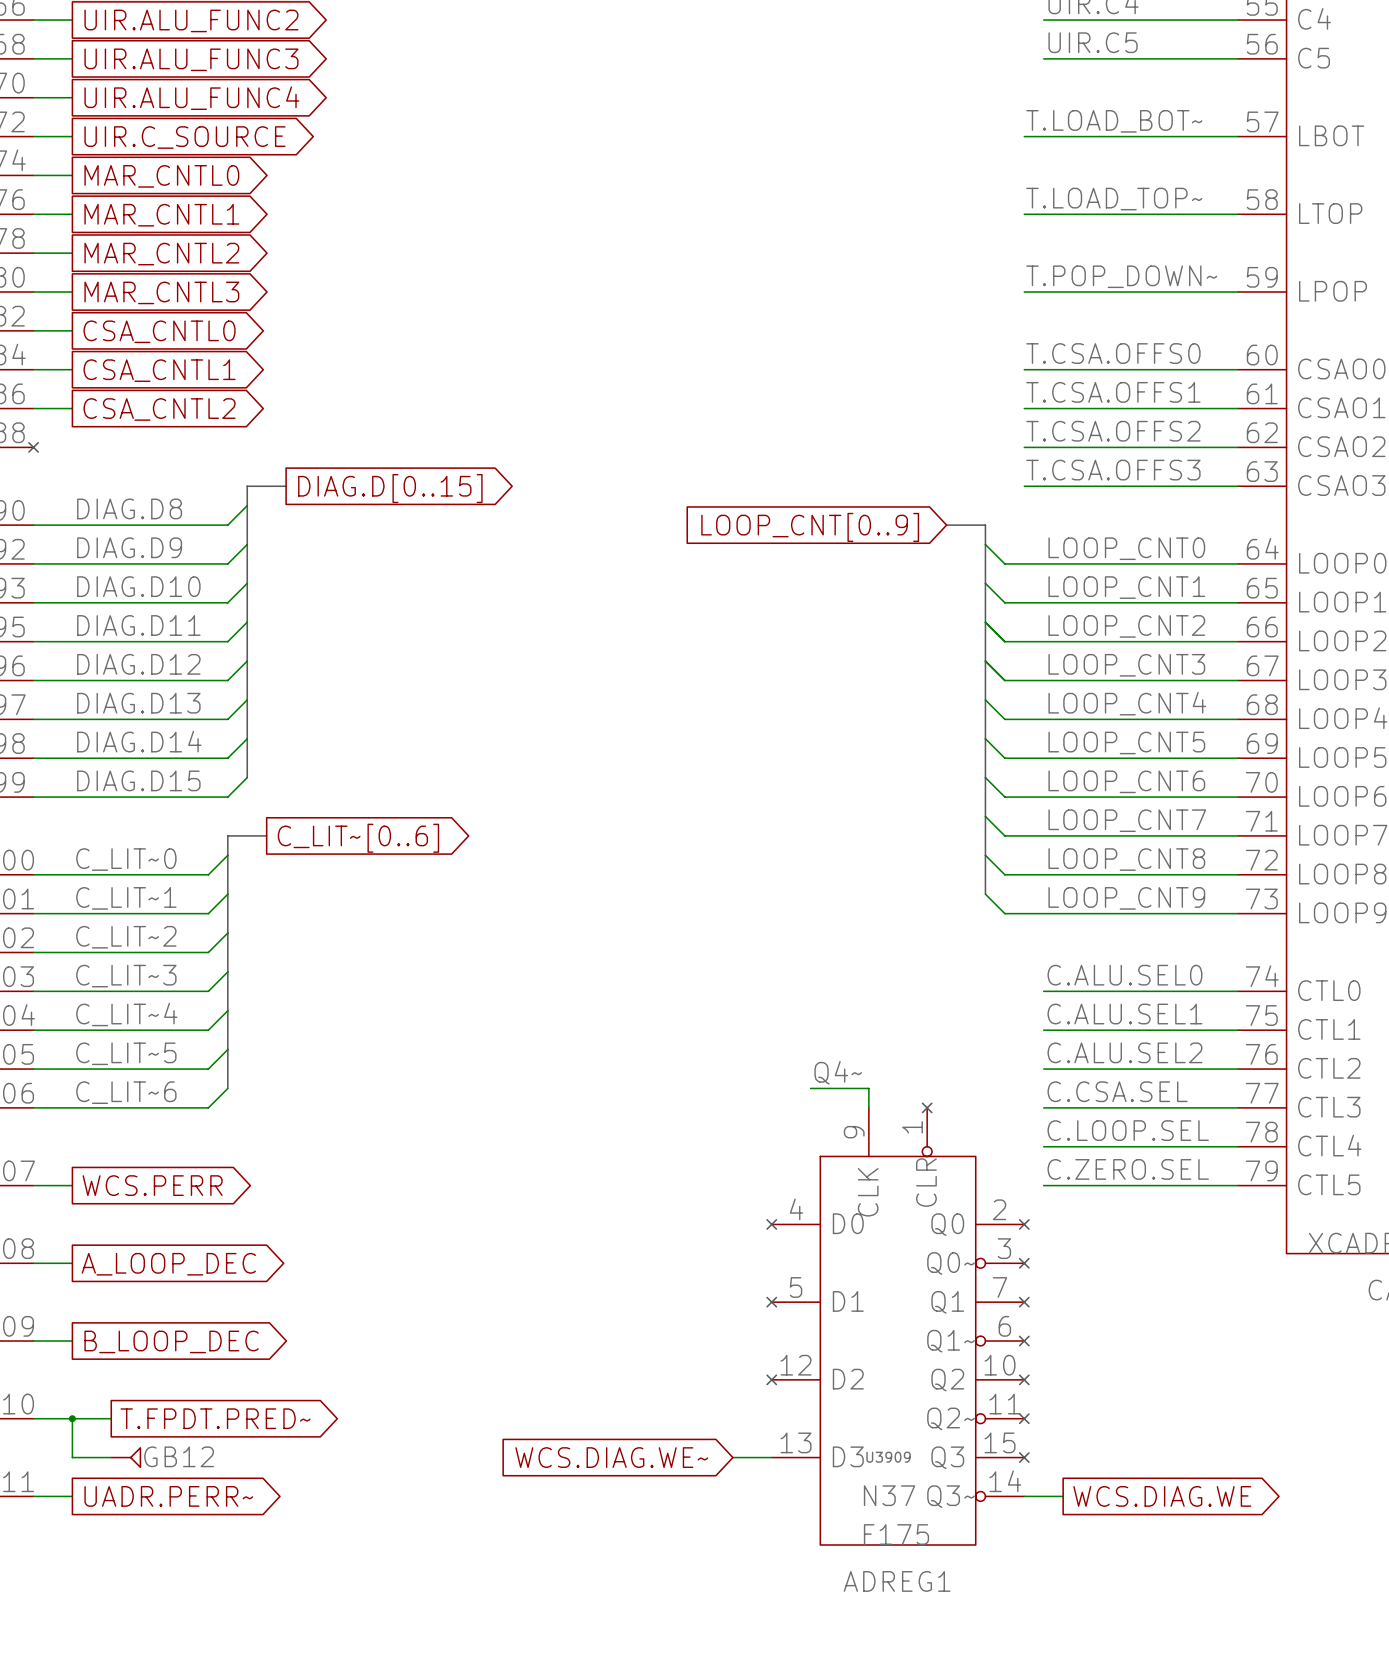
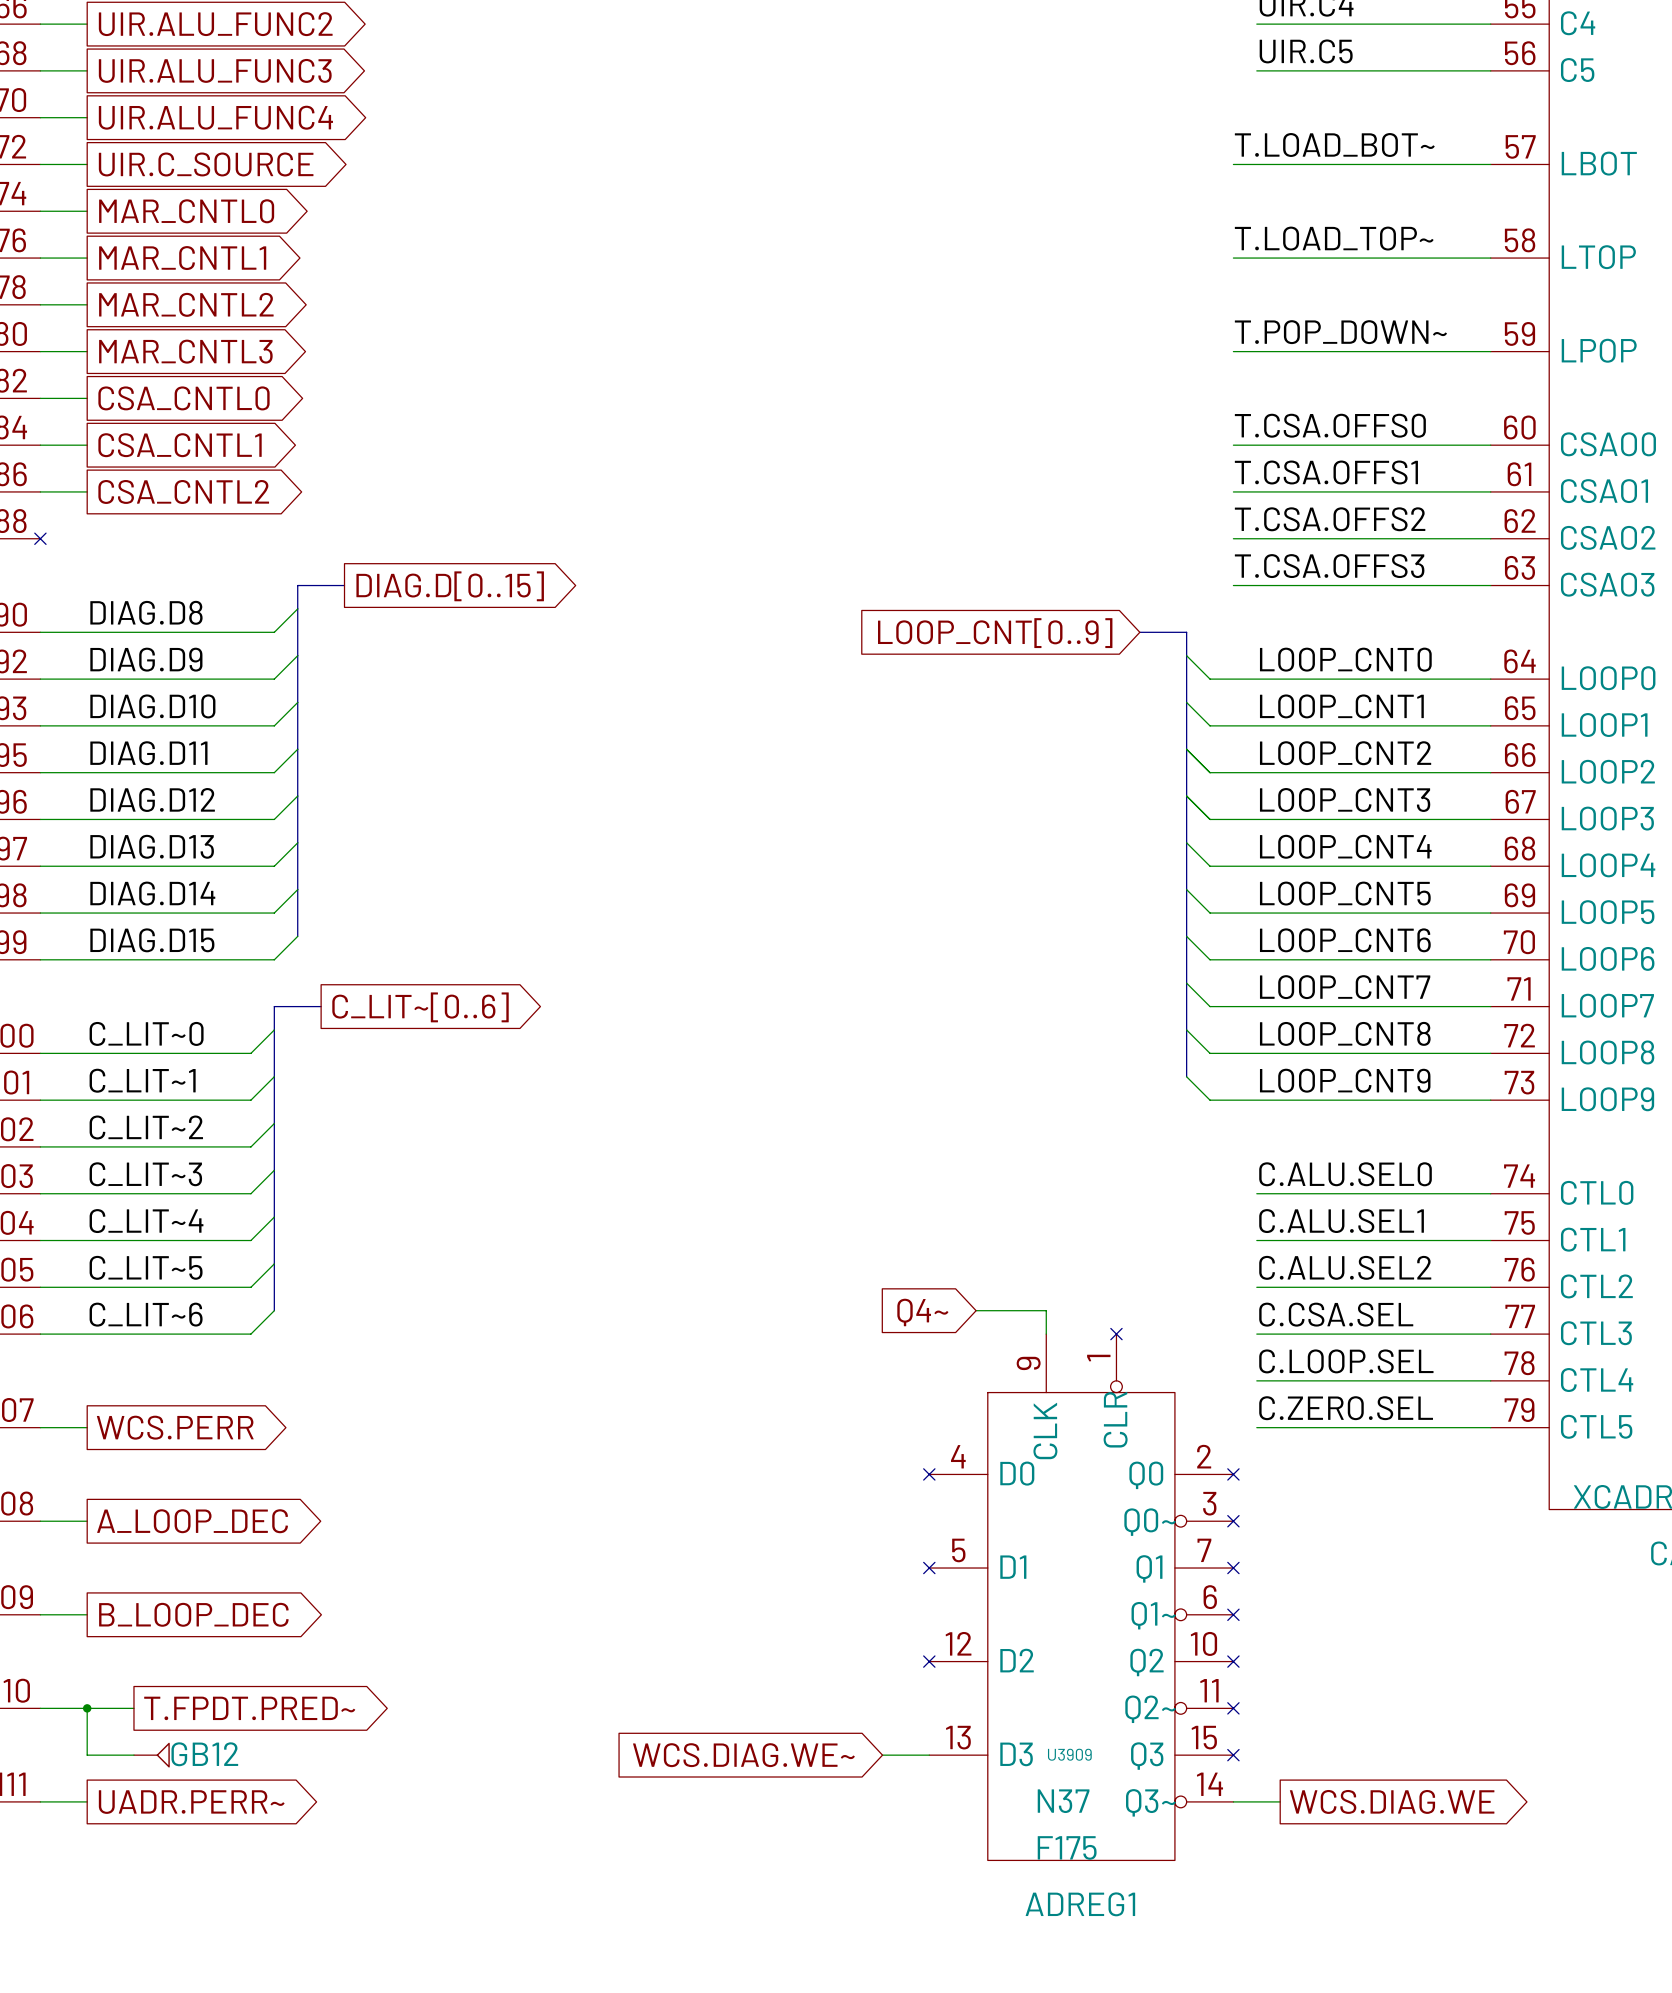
label: Q4~ (838, 1072) -> none
global label: none -> Q4~ (922, 1312)

